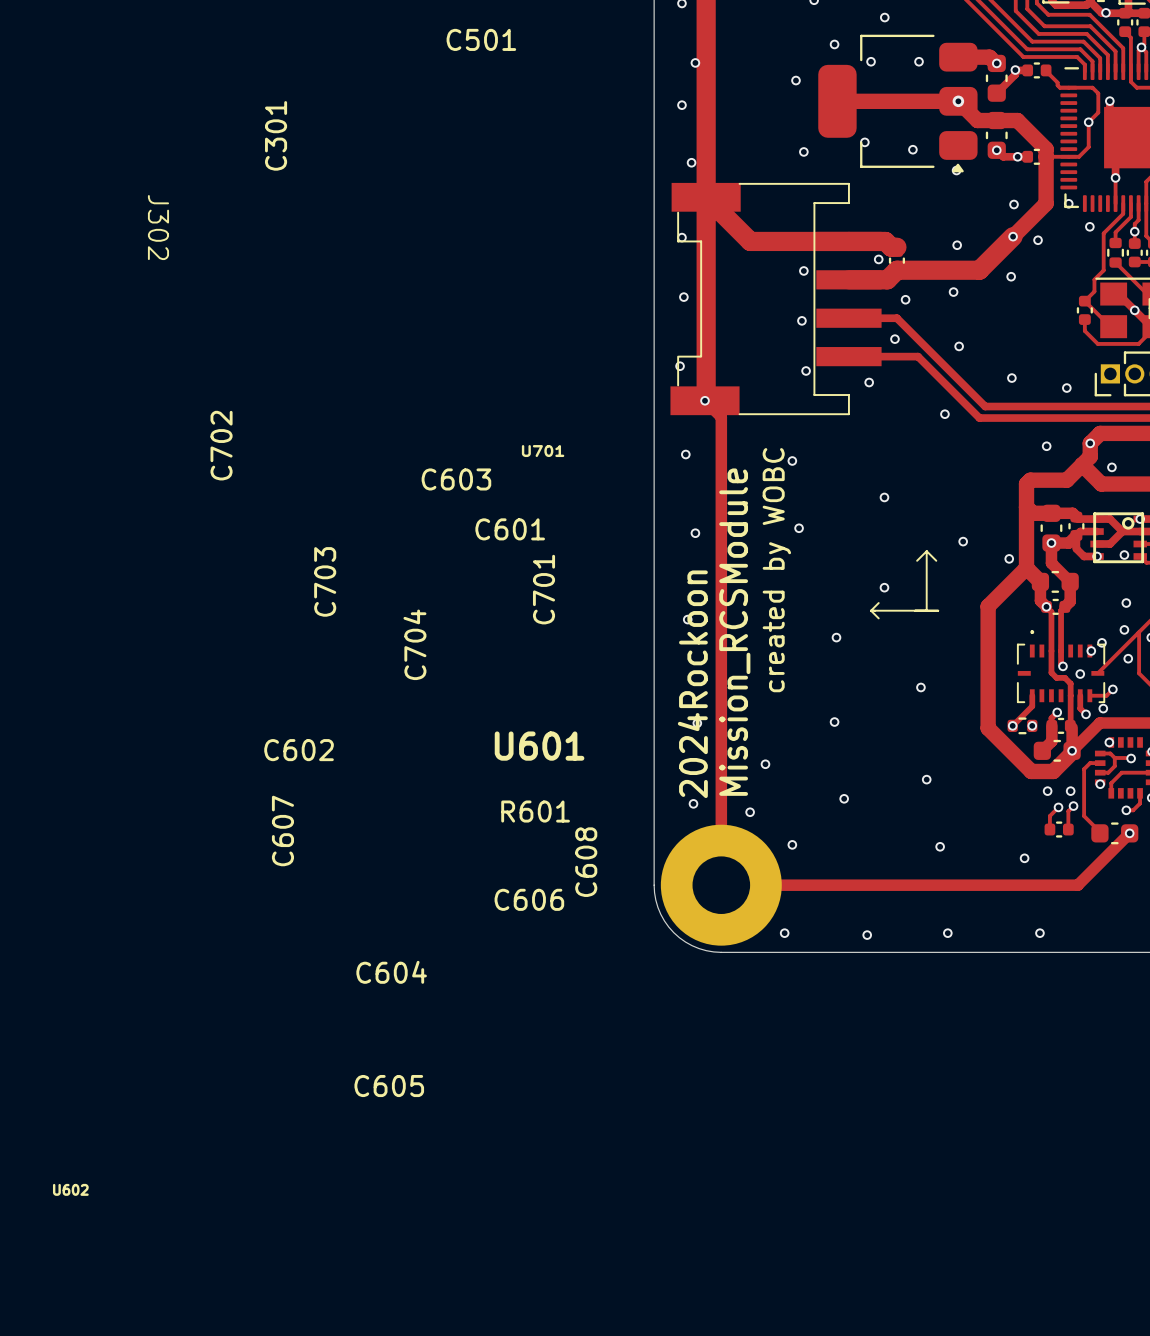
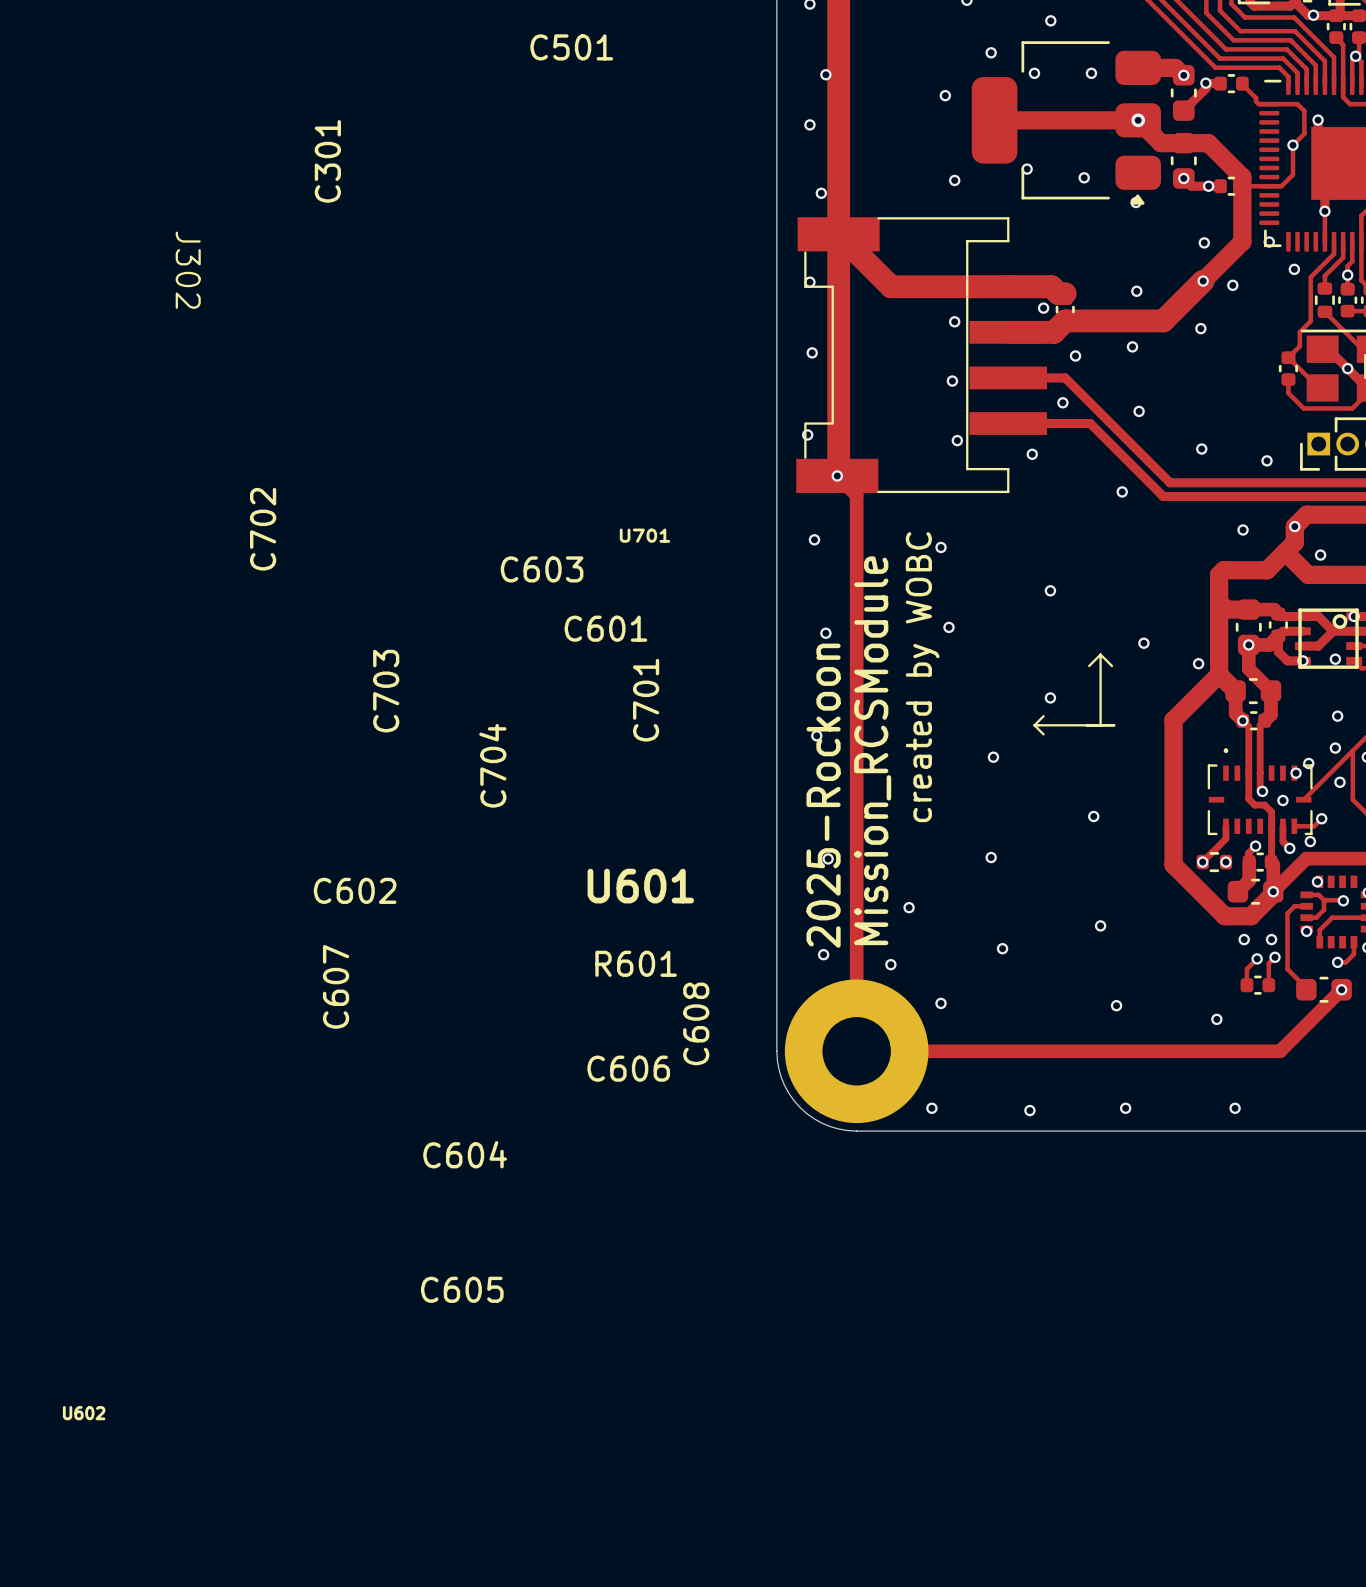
text: 2024Rockoon (692, 684) -> 2025-Rockoon (823, 795)

